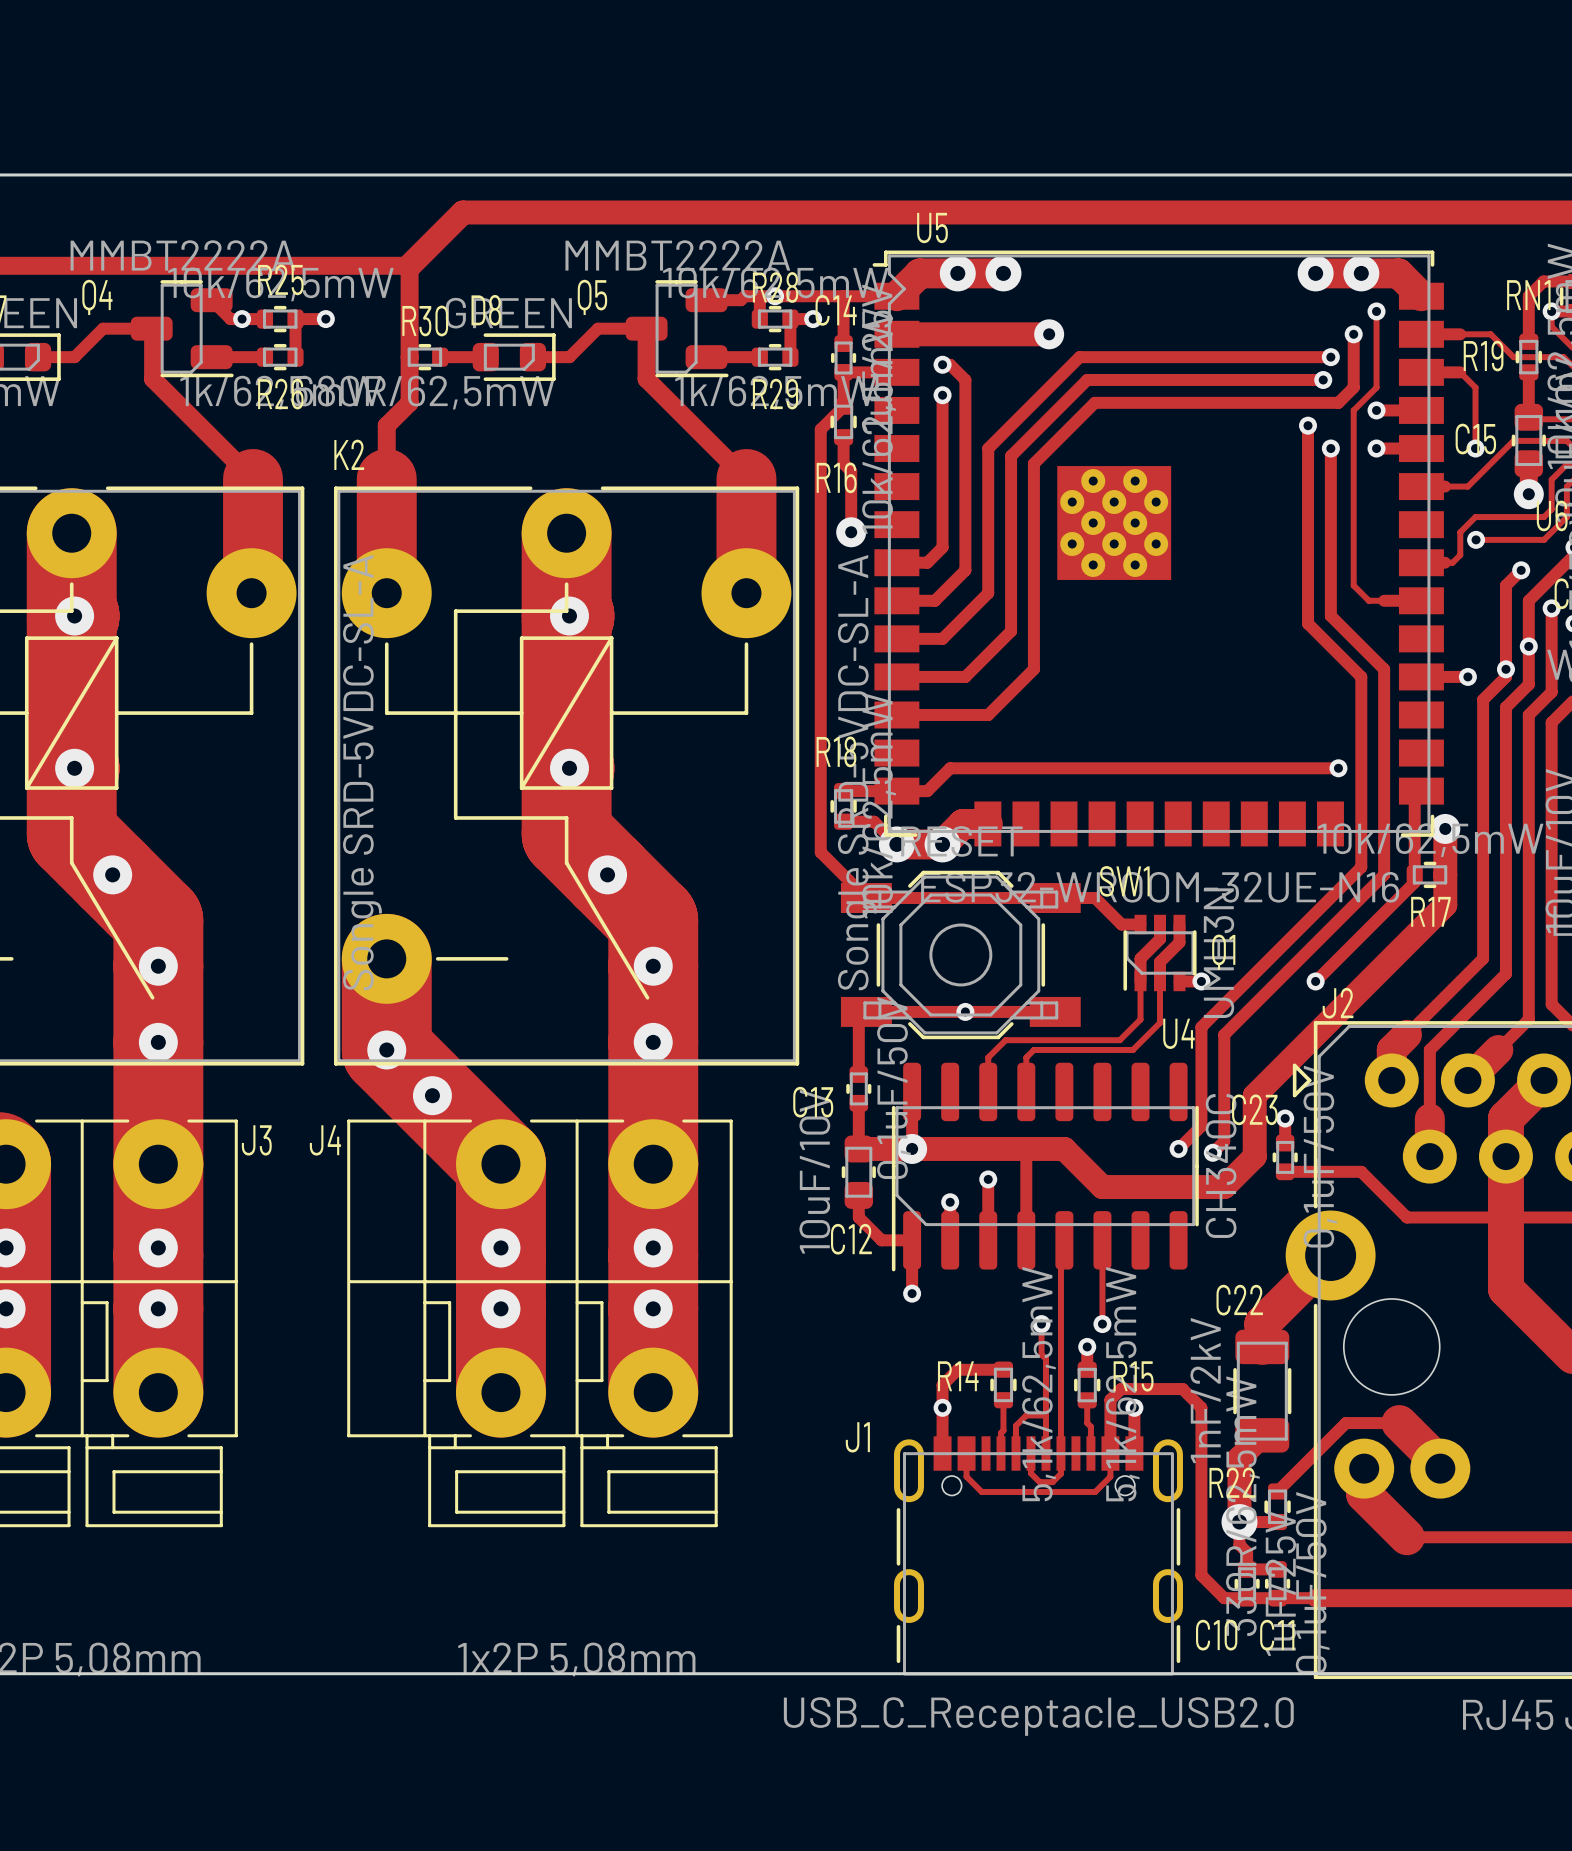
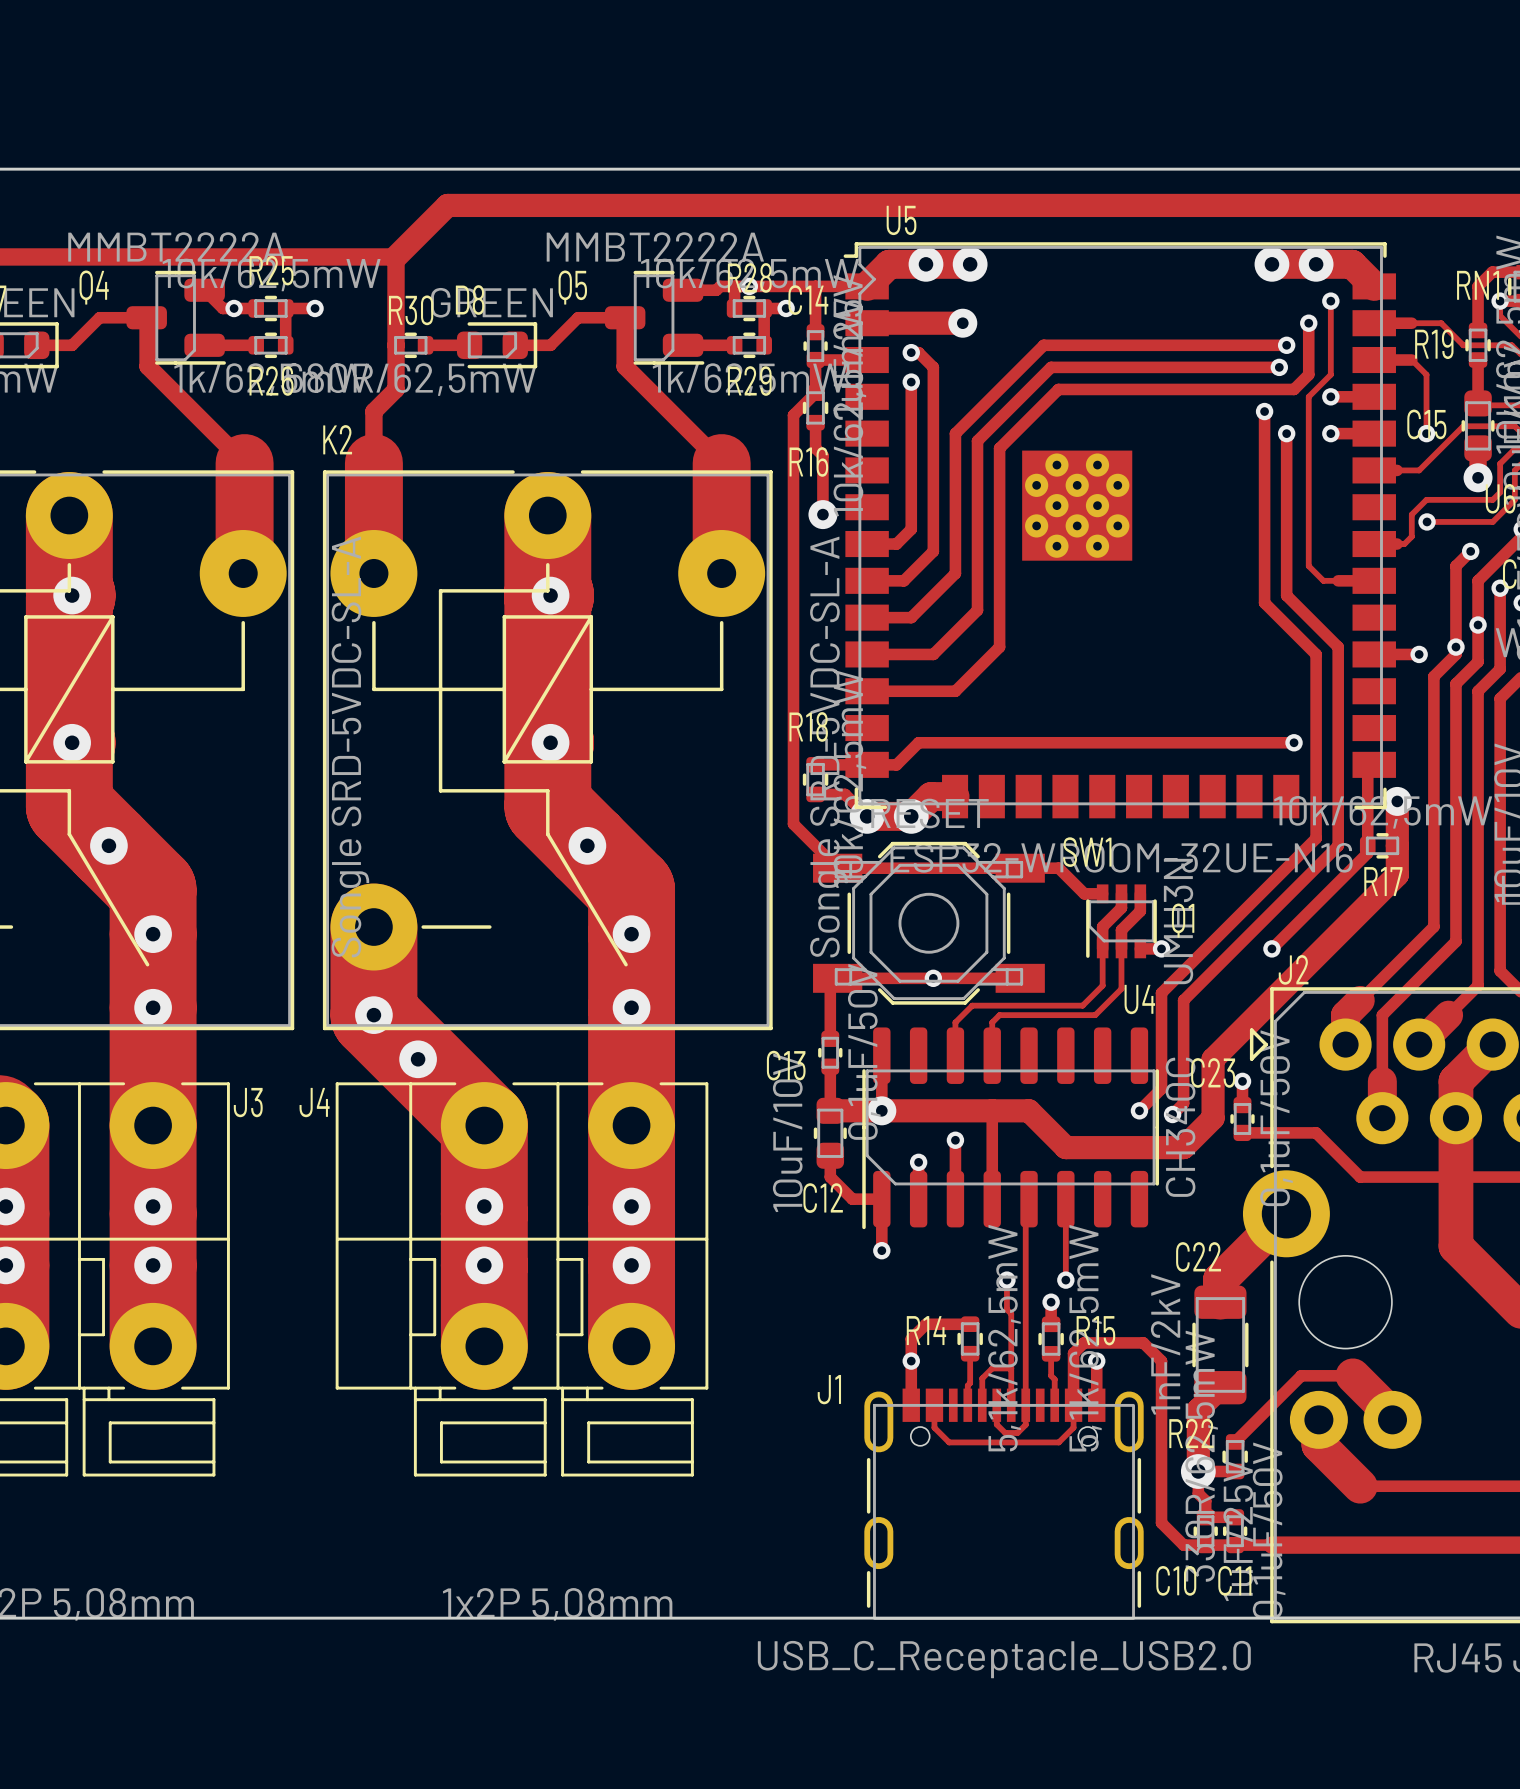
track: (995, 334) (1049, 334) -> none
via position: (1049, 334) -> (962, 323)

